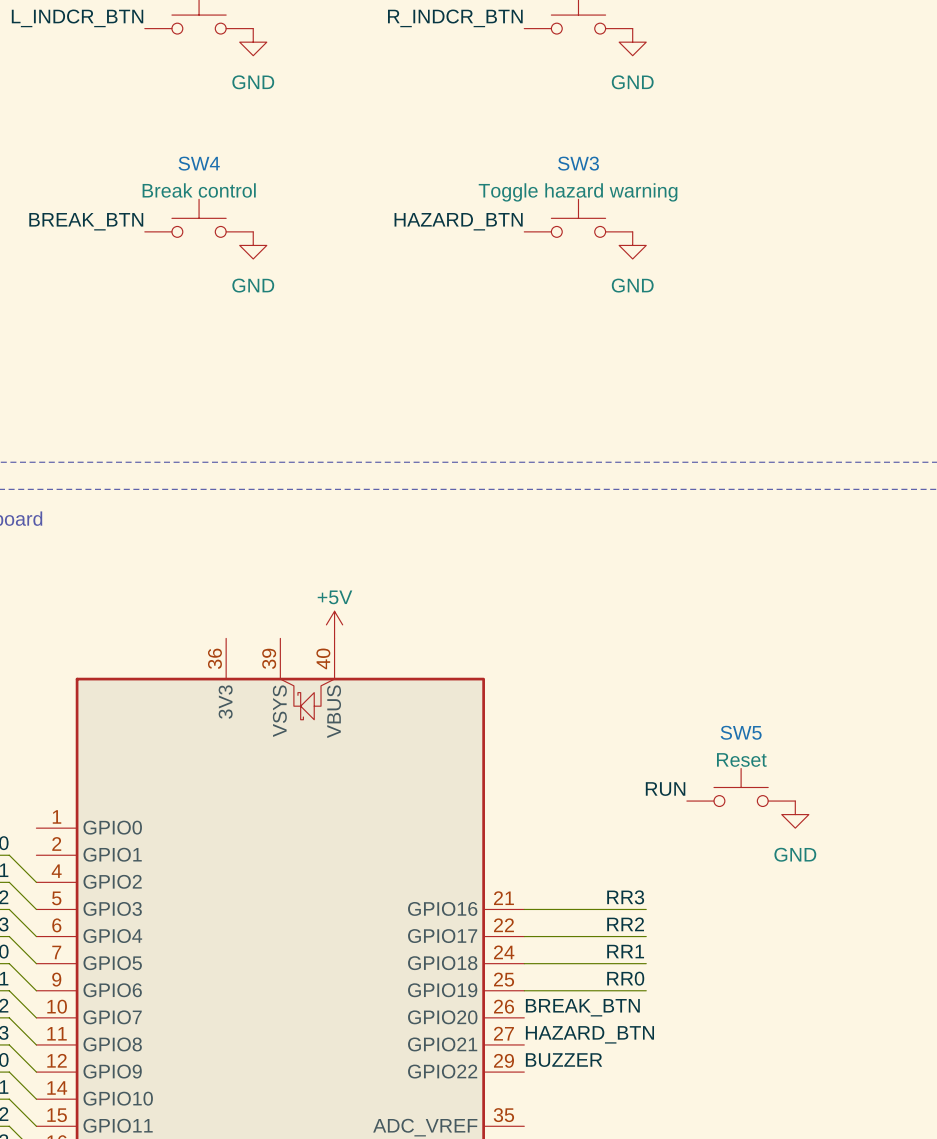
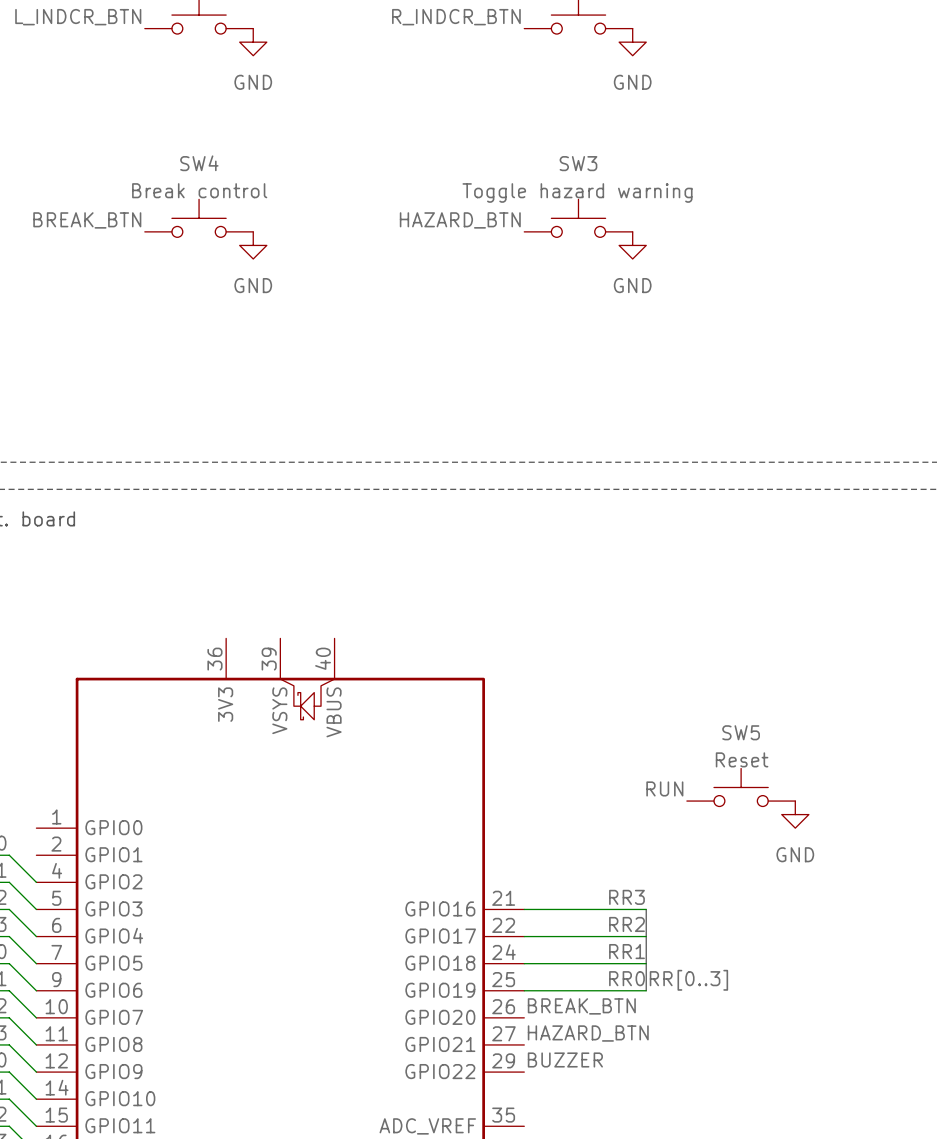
power symbol: +5V (334, 624) -> none
bus: none -> (646, 909) (646, 990)
label: none -> RR[0..3] (688, 980)

